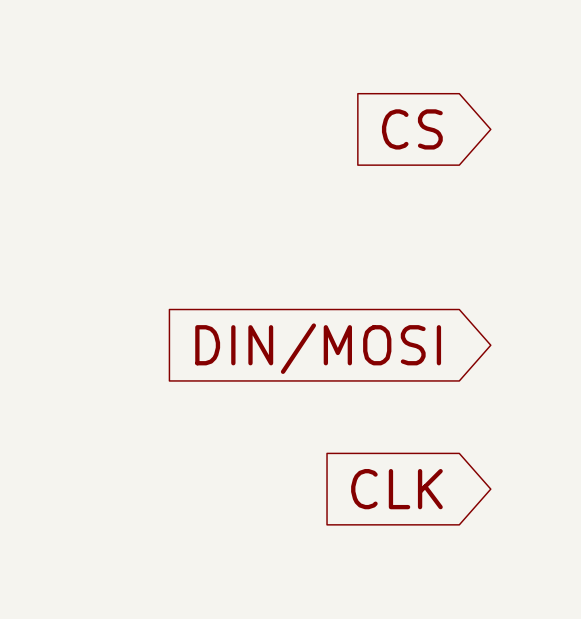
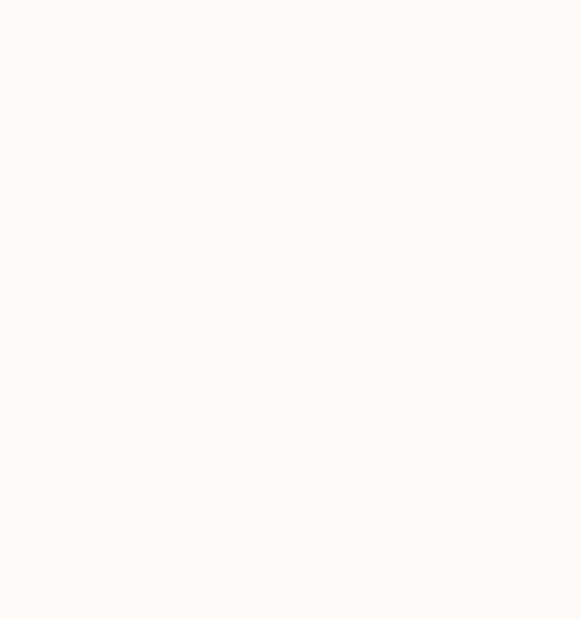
global label: CS (412, 129) -> none
global label: DIN/MOSI (318, 348) -> none
global label: CLK (396, 489) -> none

